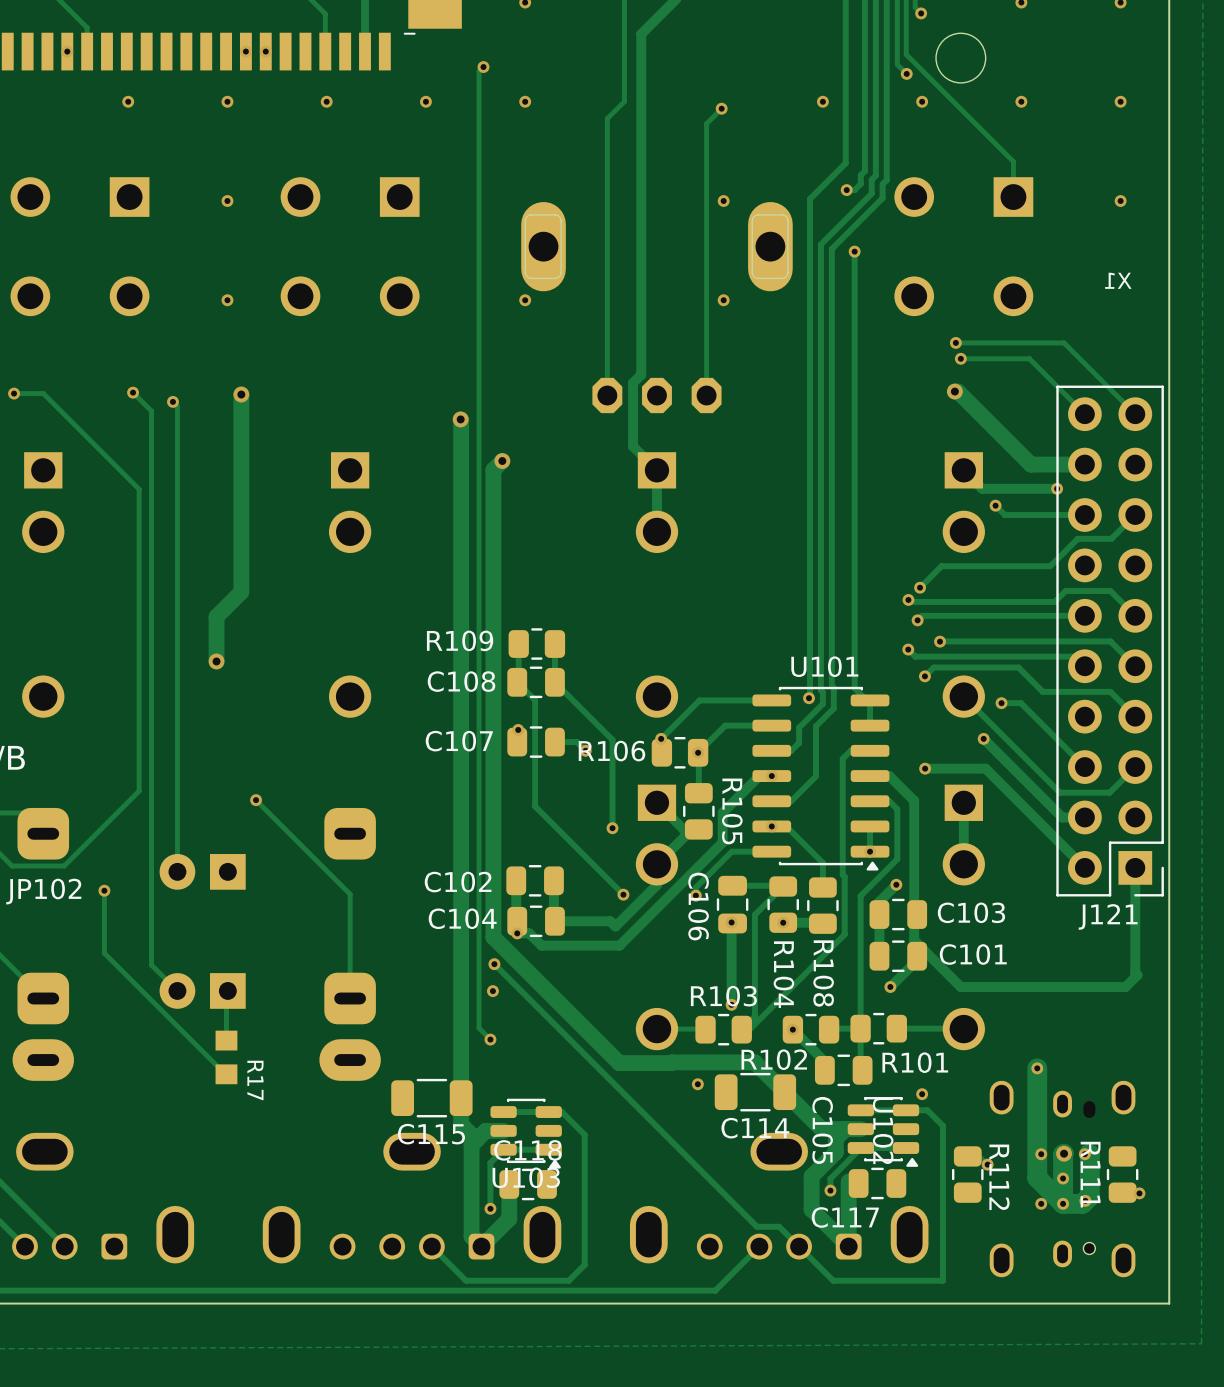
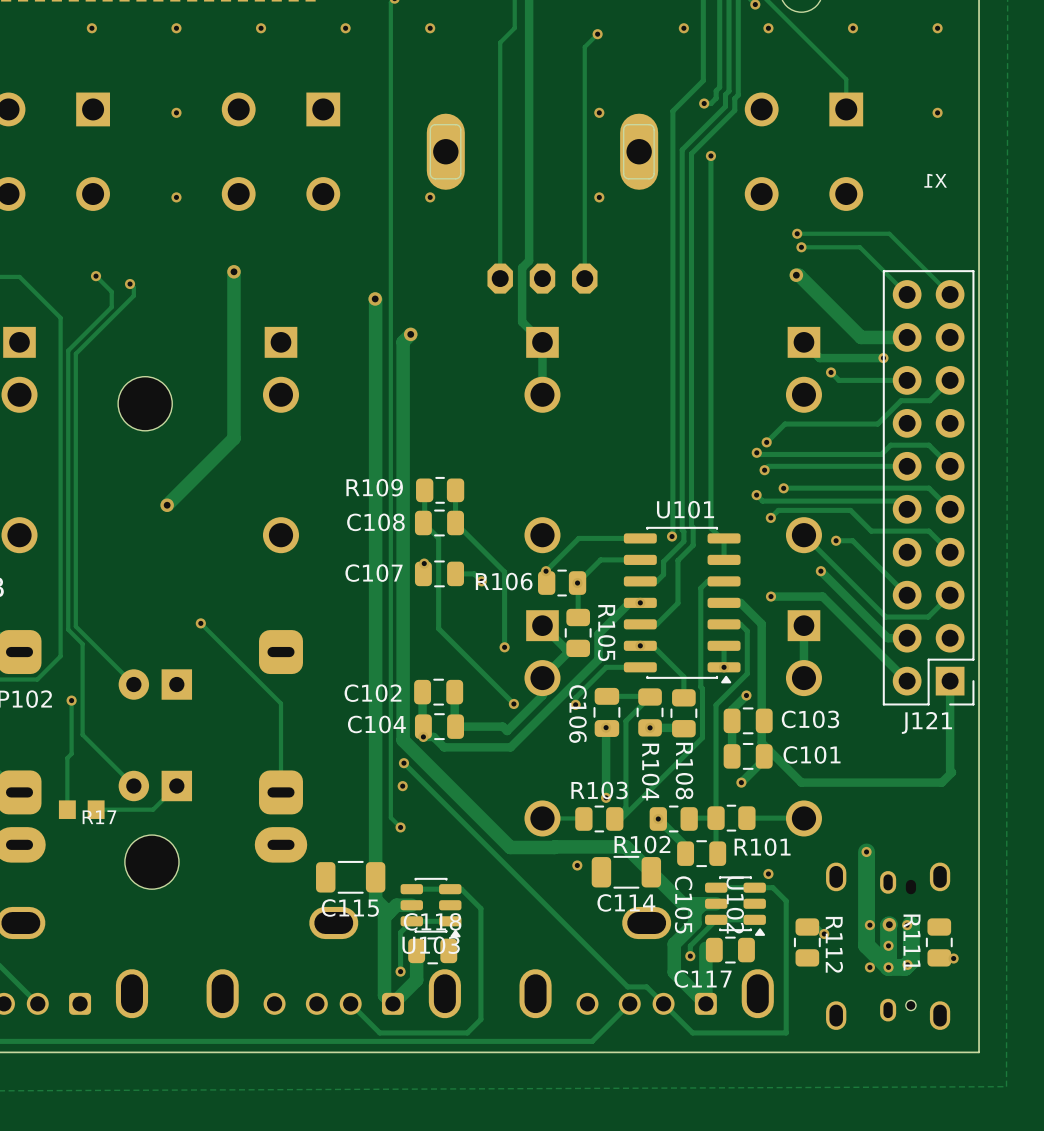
track: (241, 394) (241, 592) (216, 616) (216, 661) -> (233, 271) (233, 438) (167, 505)
via position: (241, 394) -> (233, 271)
track: (177, 415) (177, 871) -> (133, 295) (75, 353) (75, 626) (133, 684)
track: (151, 429) (151, 965) -> (111, 307) (68, 350) (68, 629) (82, 644) (82, 734) (111, 763)
track: (91, 441) (139, 489) (139, 791) (91, 838) -> (60, 317) (60, 656)
part: none -> (145, 403)
track: (104, 953) (225, 1074) -> (71, 753) (67, 758) (67, 809)
track: none -> (176, 786) (153, 809) (96, 809)
track: (226, 992) (226, 1040) -> none
R17 rotation: 0° (226, 1057) -> 90° clockwise (81, 809)
R17 position: (226, 1057) -> (81, 809)
part: none -> (151, 862)

